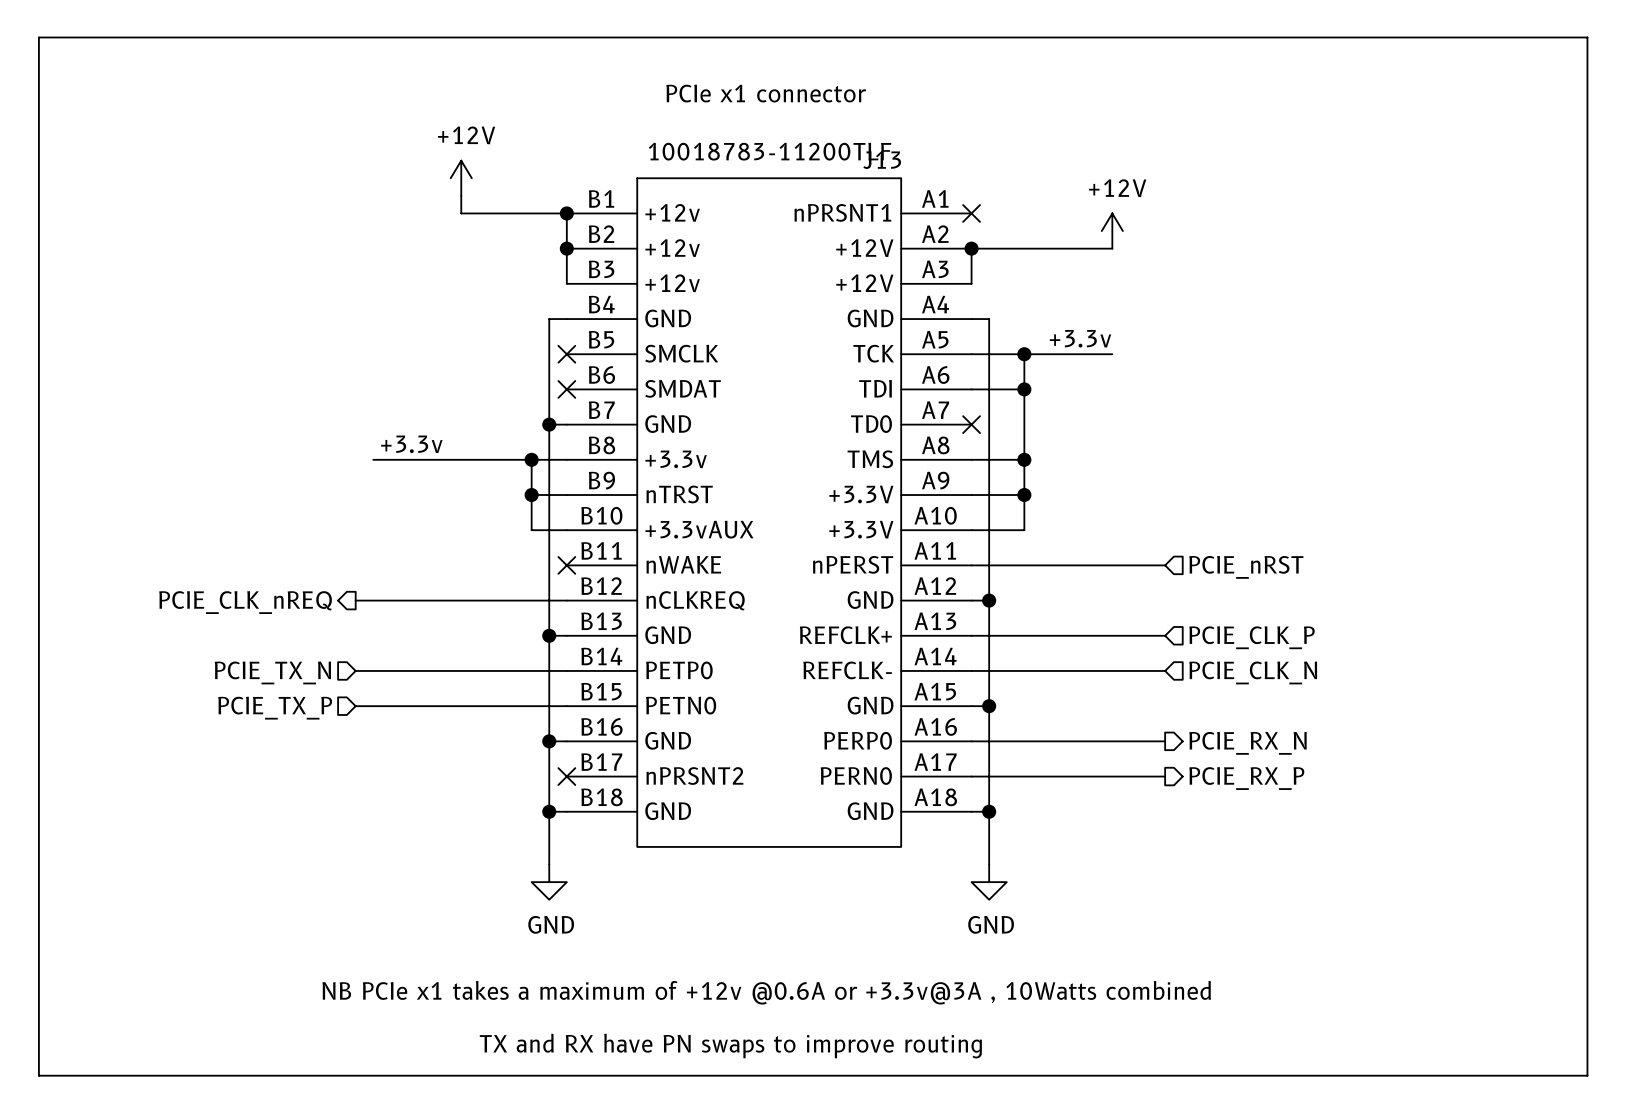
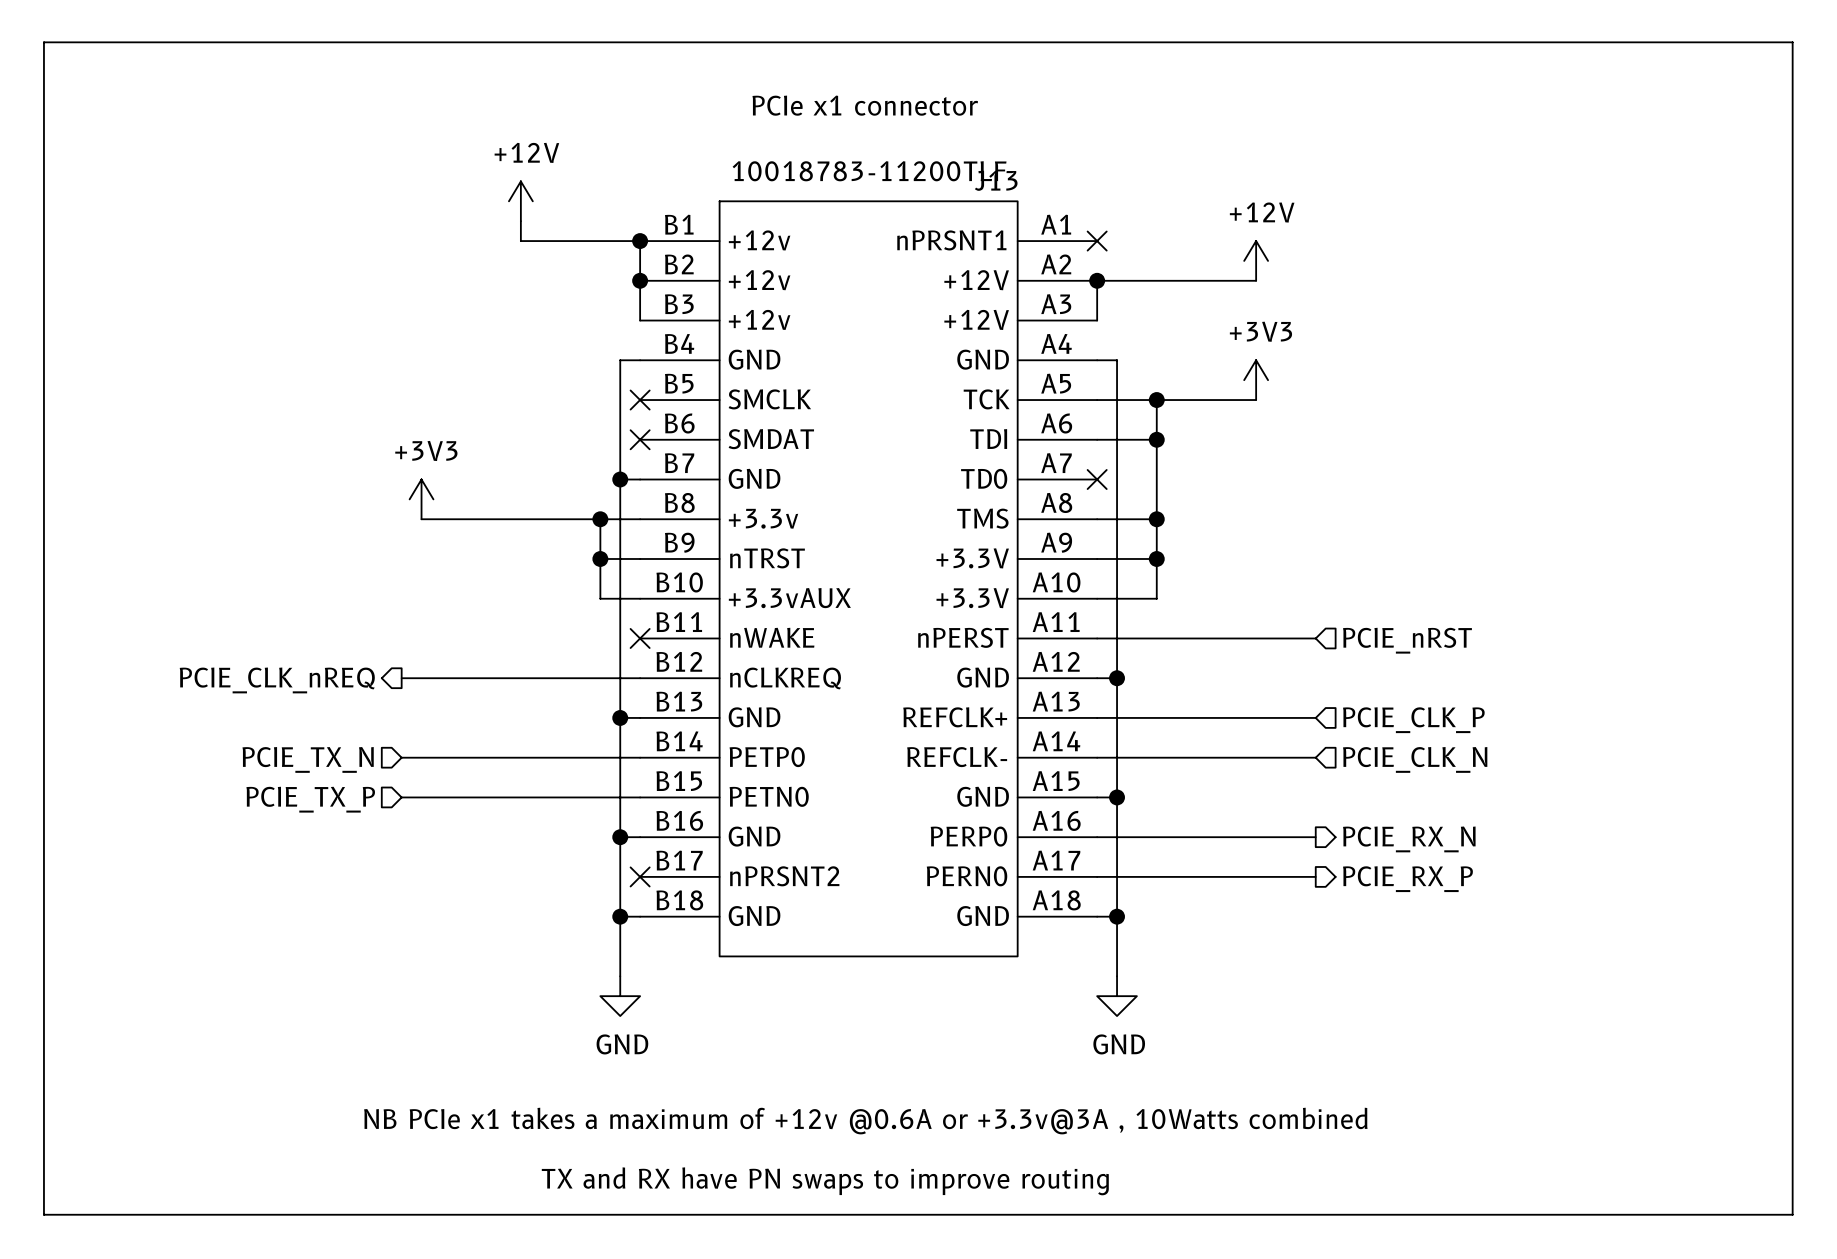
power symbol: none -> +3V3 (1256, 380)
label: +3.3v (1080, 338) -> none
power symbol: none -> +3V3 (421, 499)
label: +3.3v (411, 444) -> none

